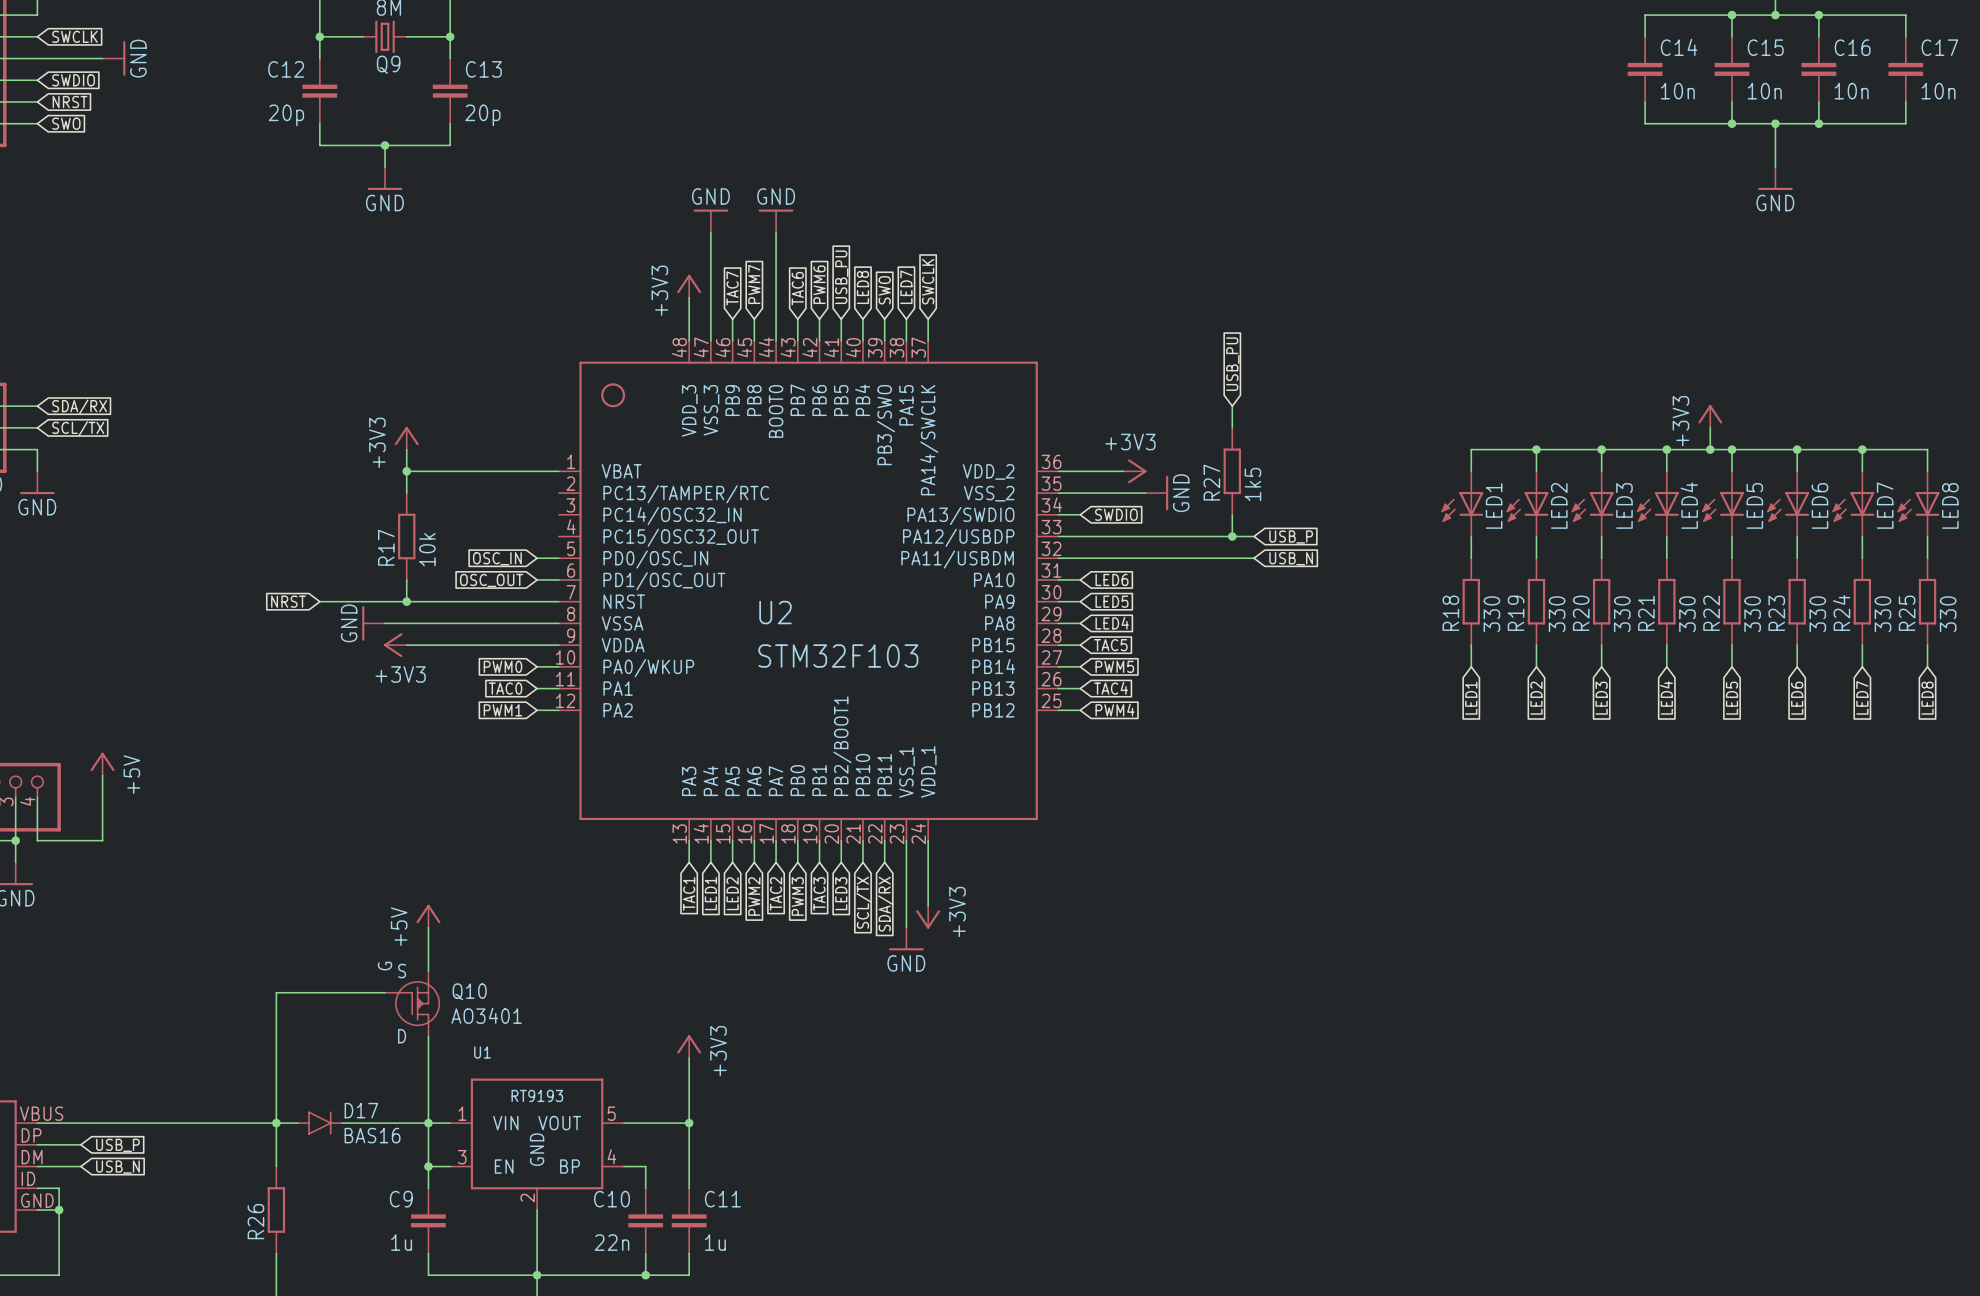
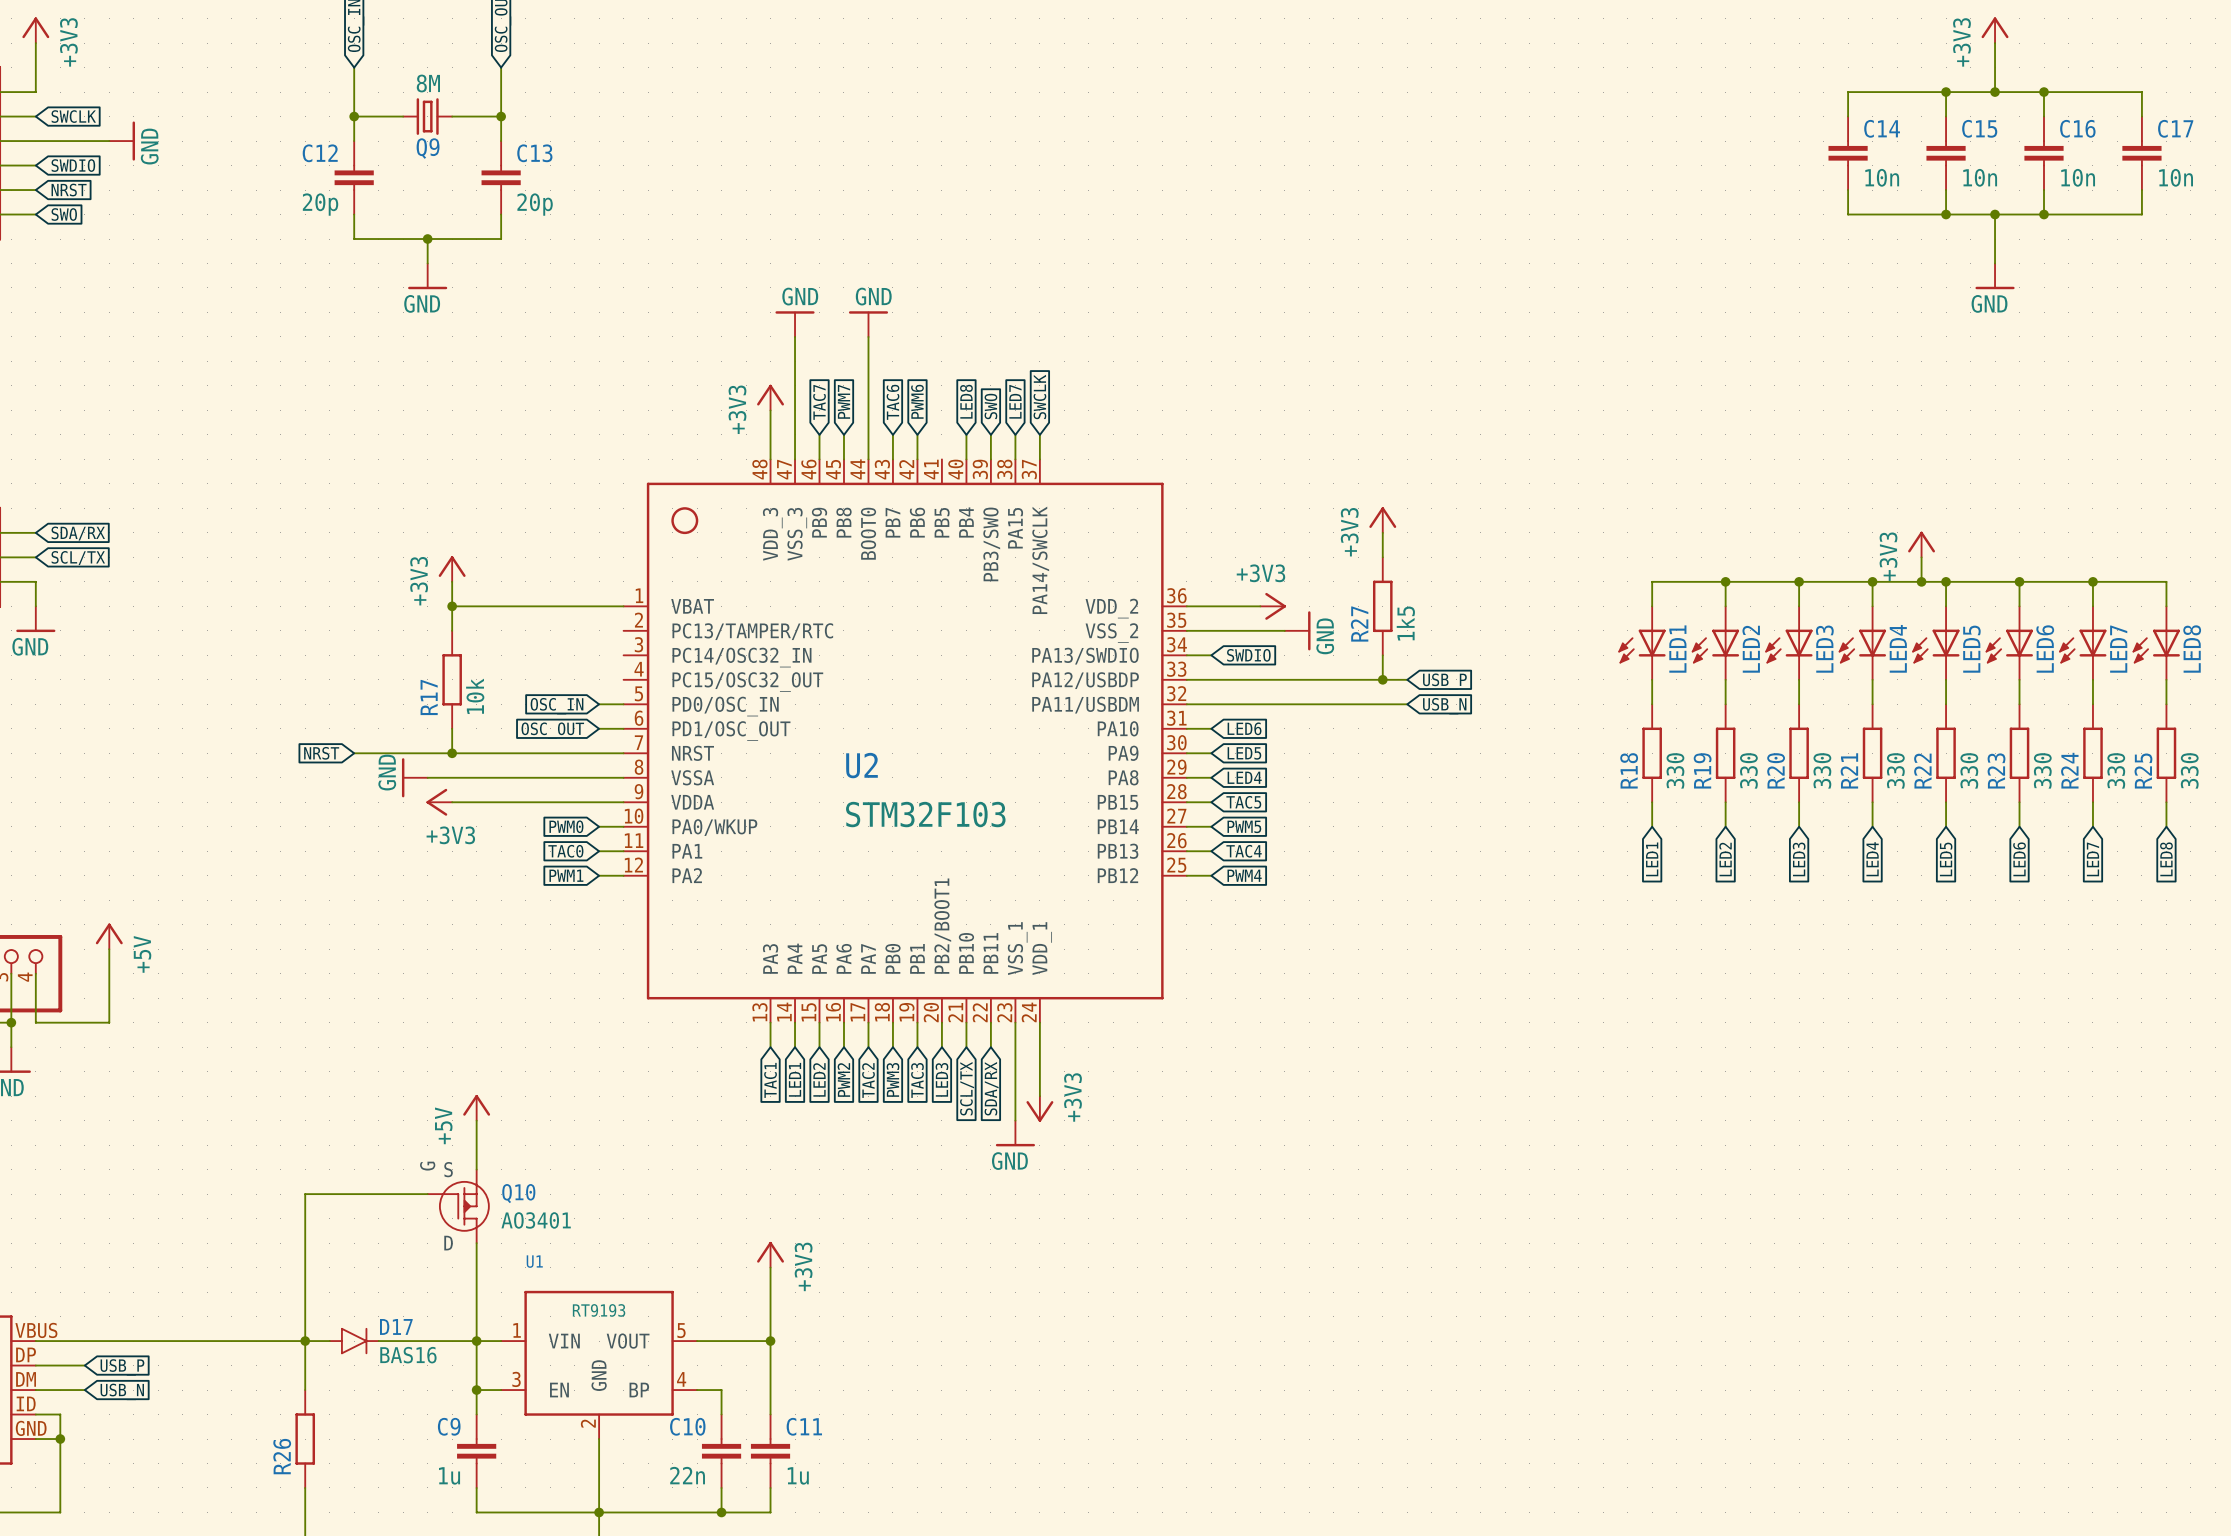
global label: USB_PU (841, 277) -> none
wire: (841, 319) (841, 340) -> none
global label: USB_PU (1232, 364) -> none
power symbol: none -> +3V3 (1382, 520)

